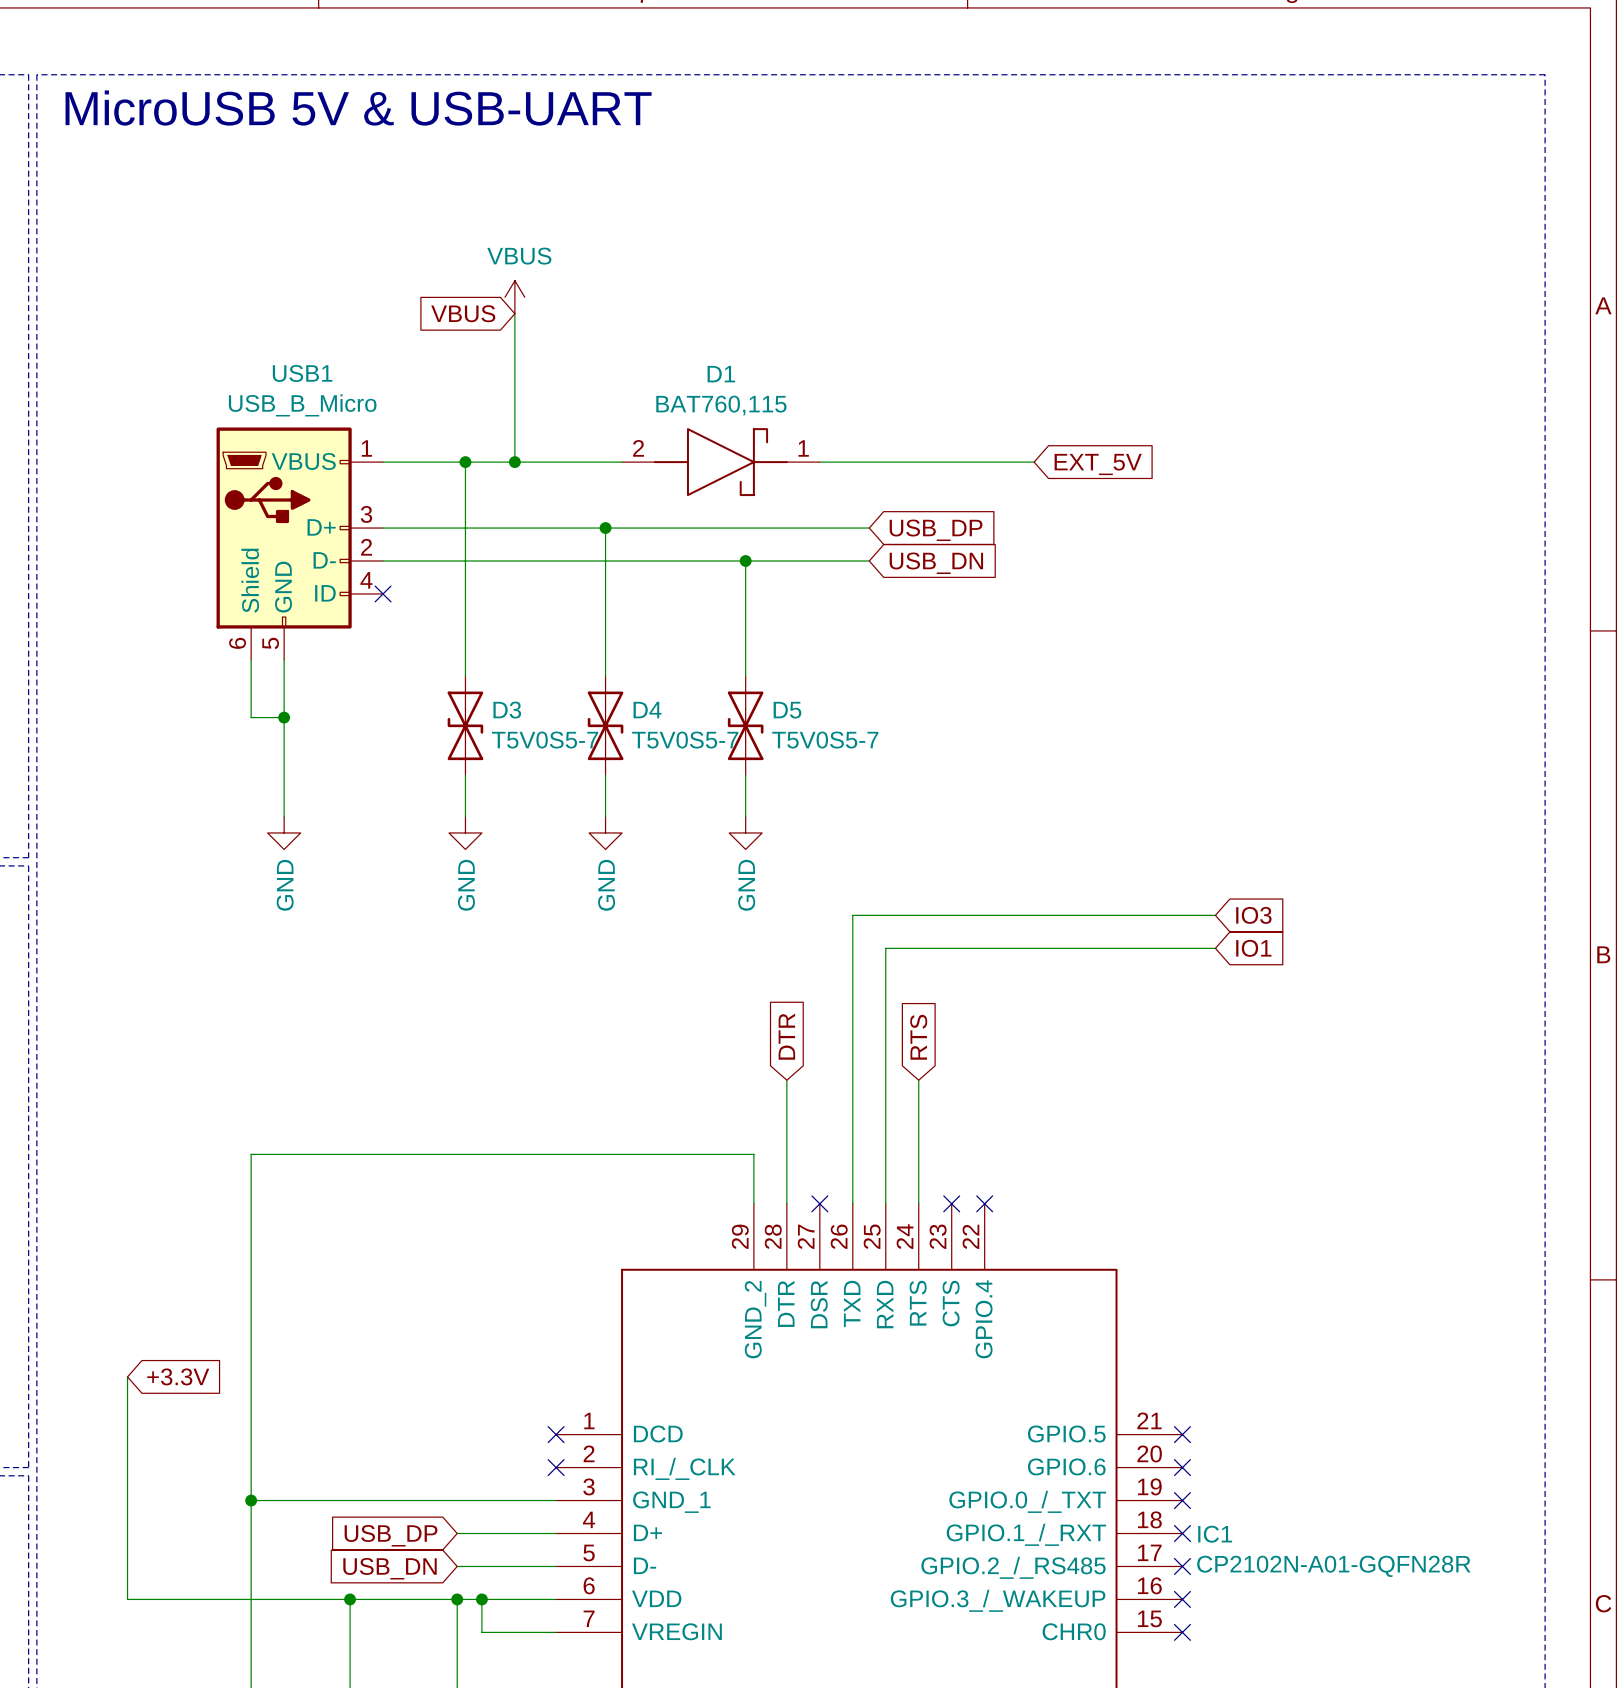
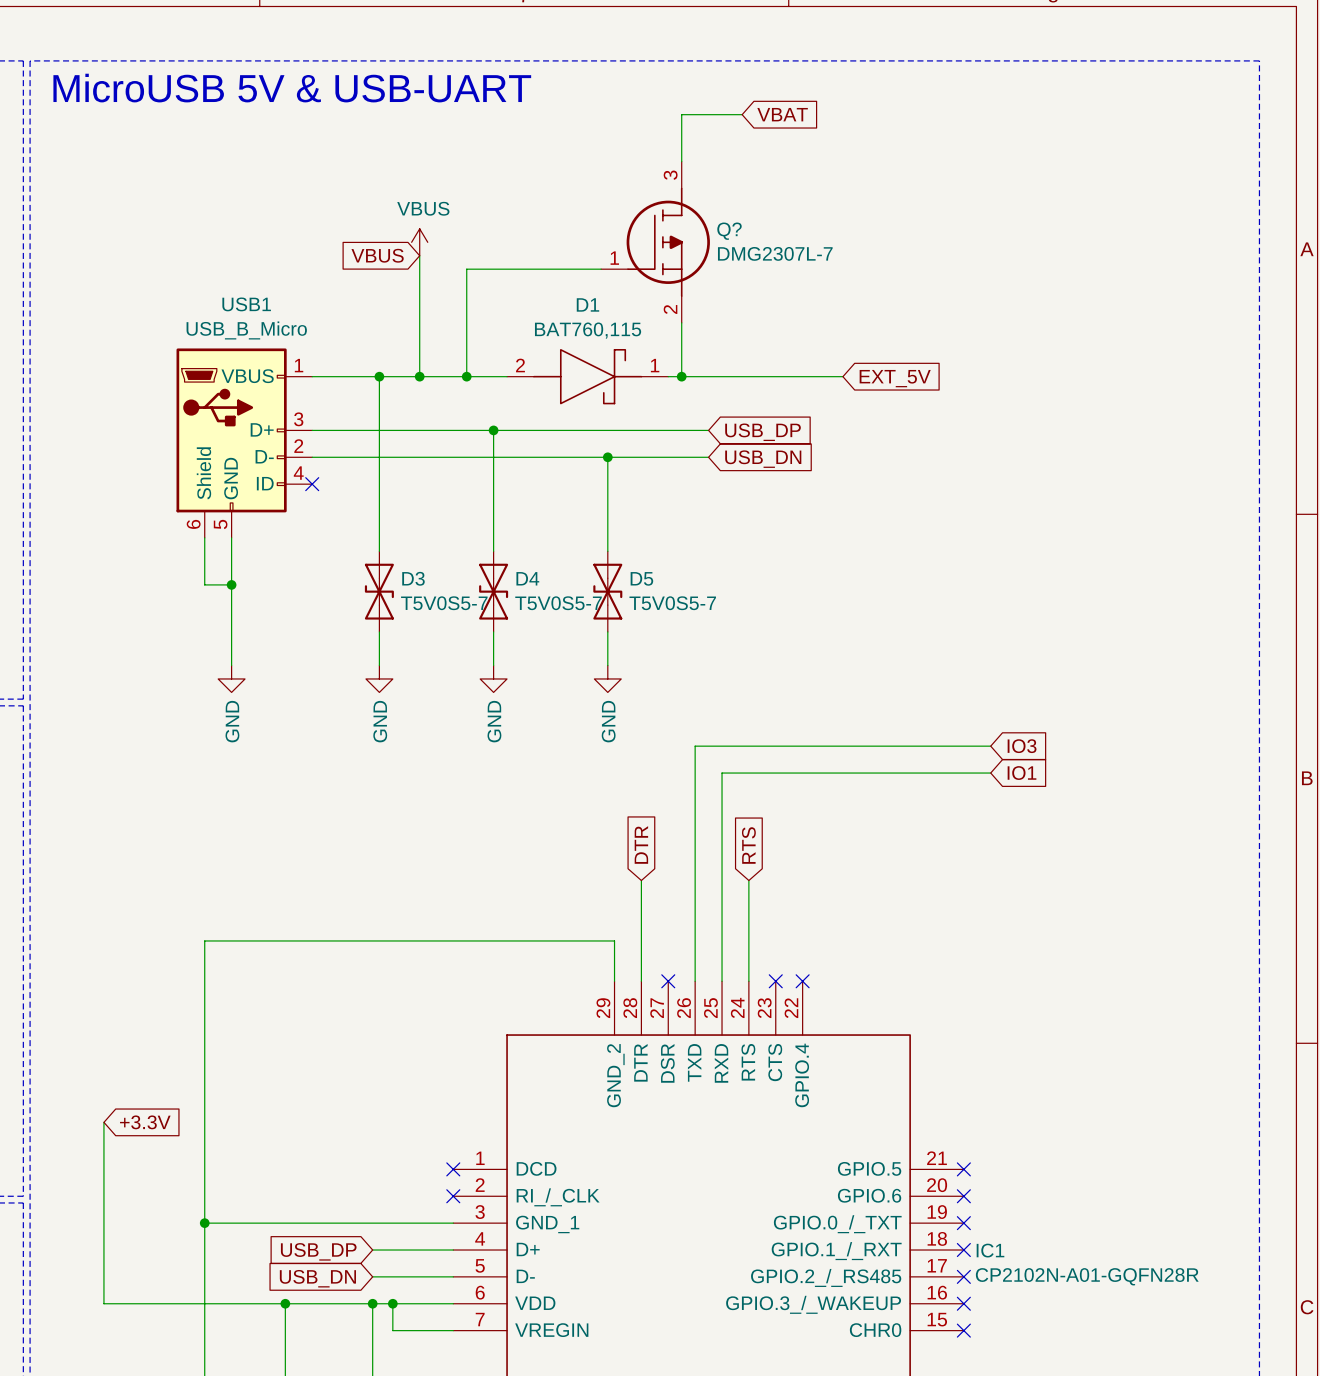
wire: none -> (742, 114) (681, 114) (681, 161)
global label: none -> VBAT (782, 114)
Q?: none -> DMG2307L-7 (655, 242)
wire: none -> (601, 269) (466, 269) (466, 376)
wire: none -> (681, 322) (681, 376)
junction: none -> (466, 376)
junction: none -> (681, 376)

